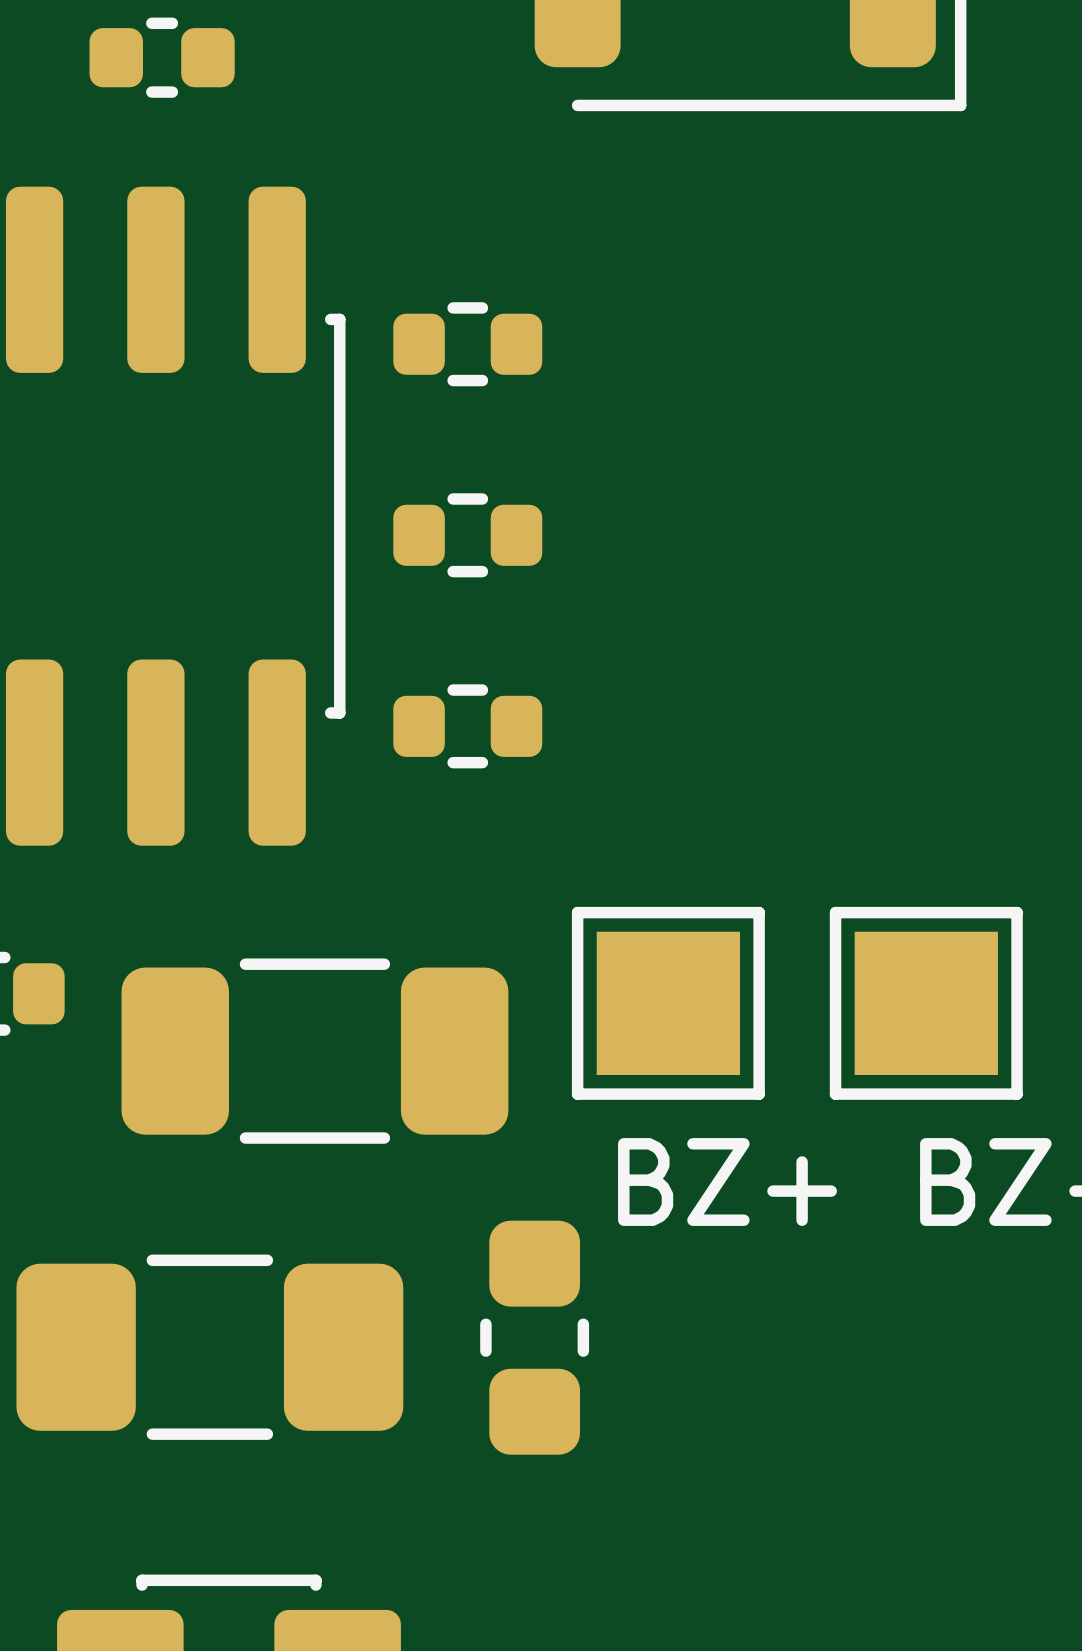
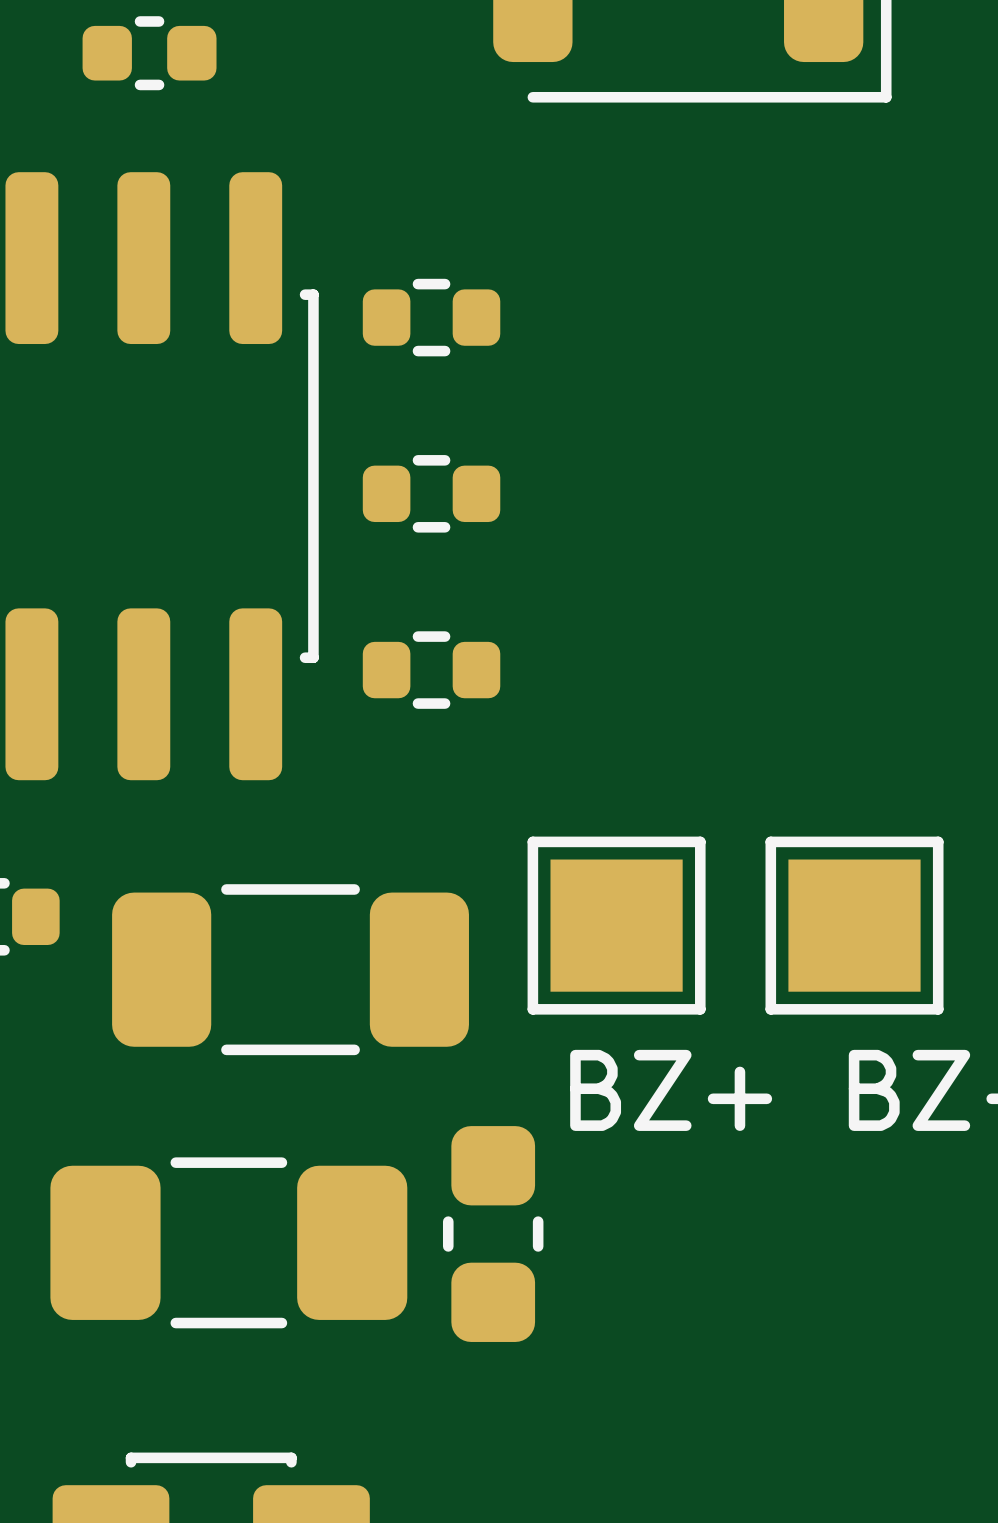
part position: (209, 1347) -> (228, 1242)

